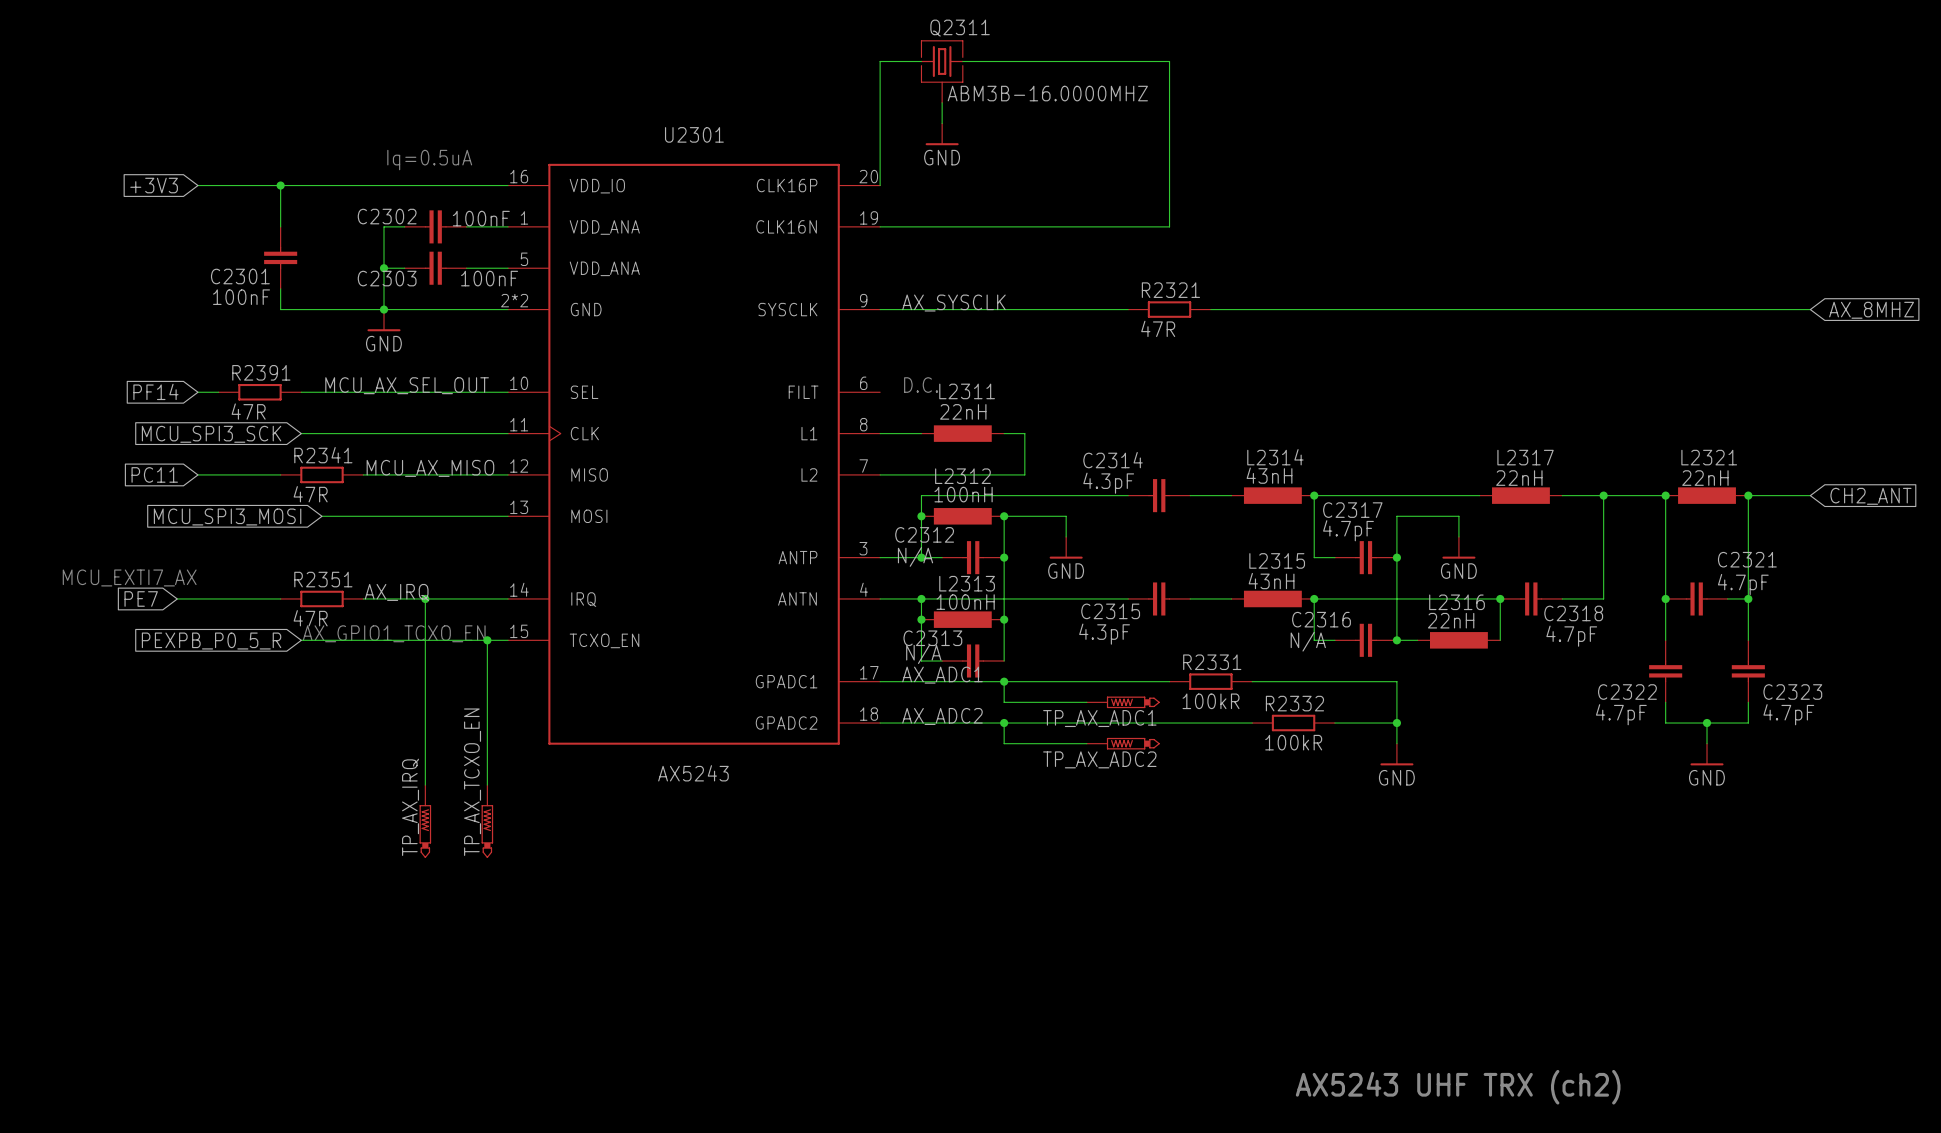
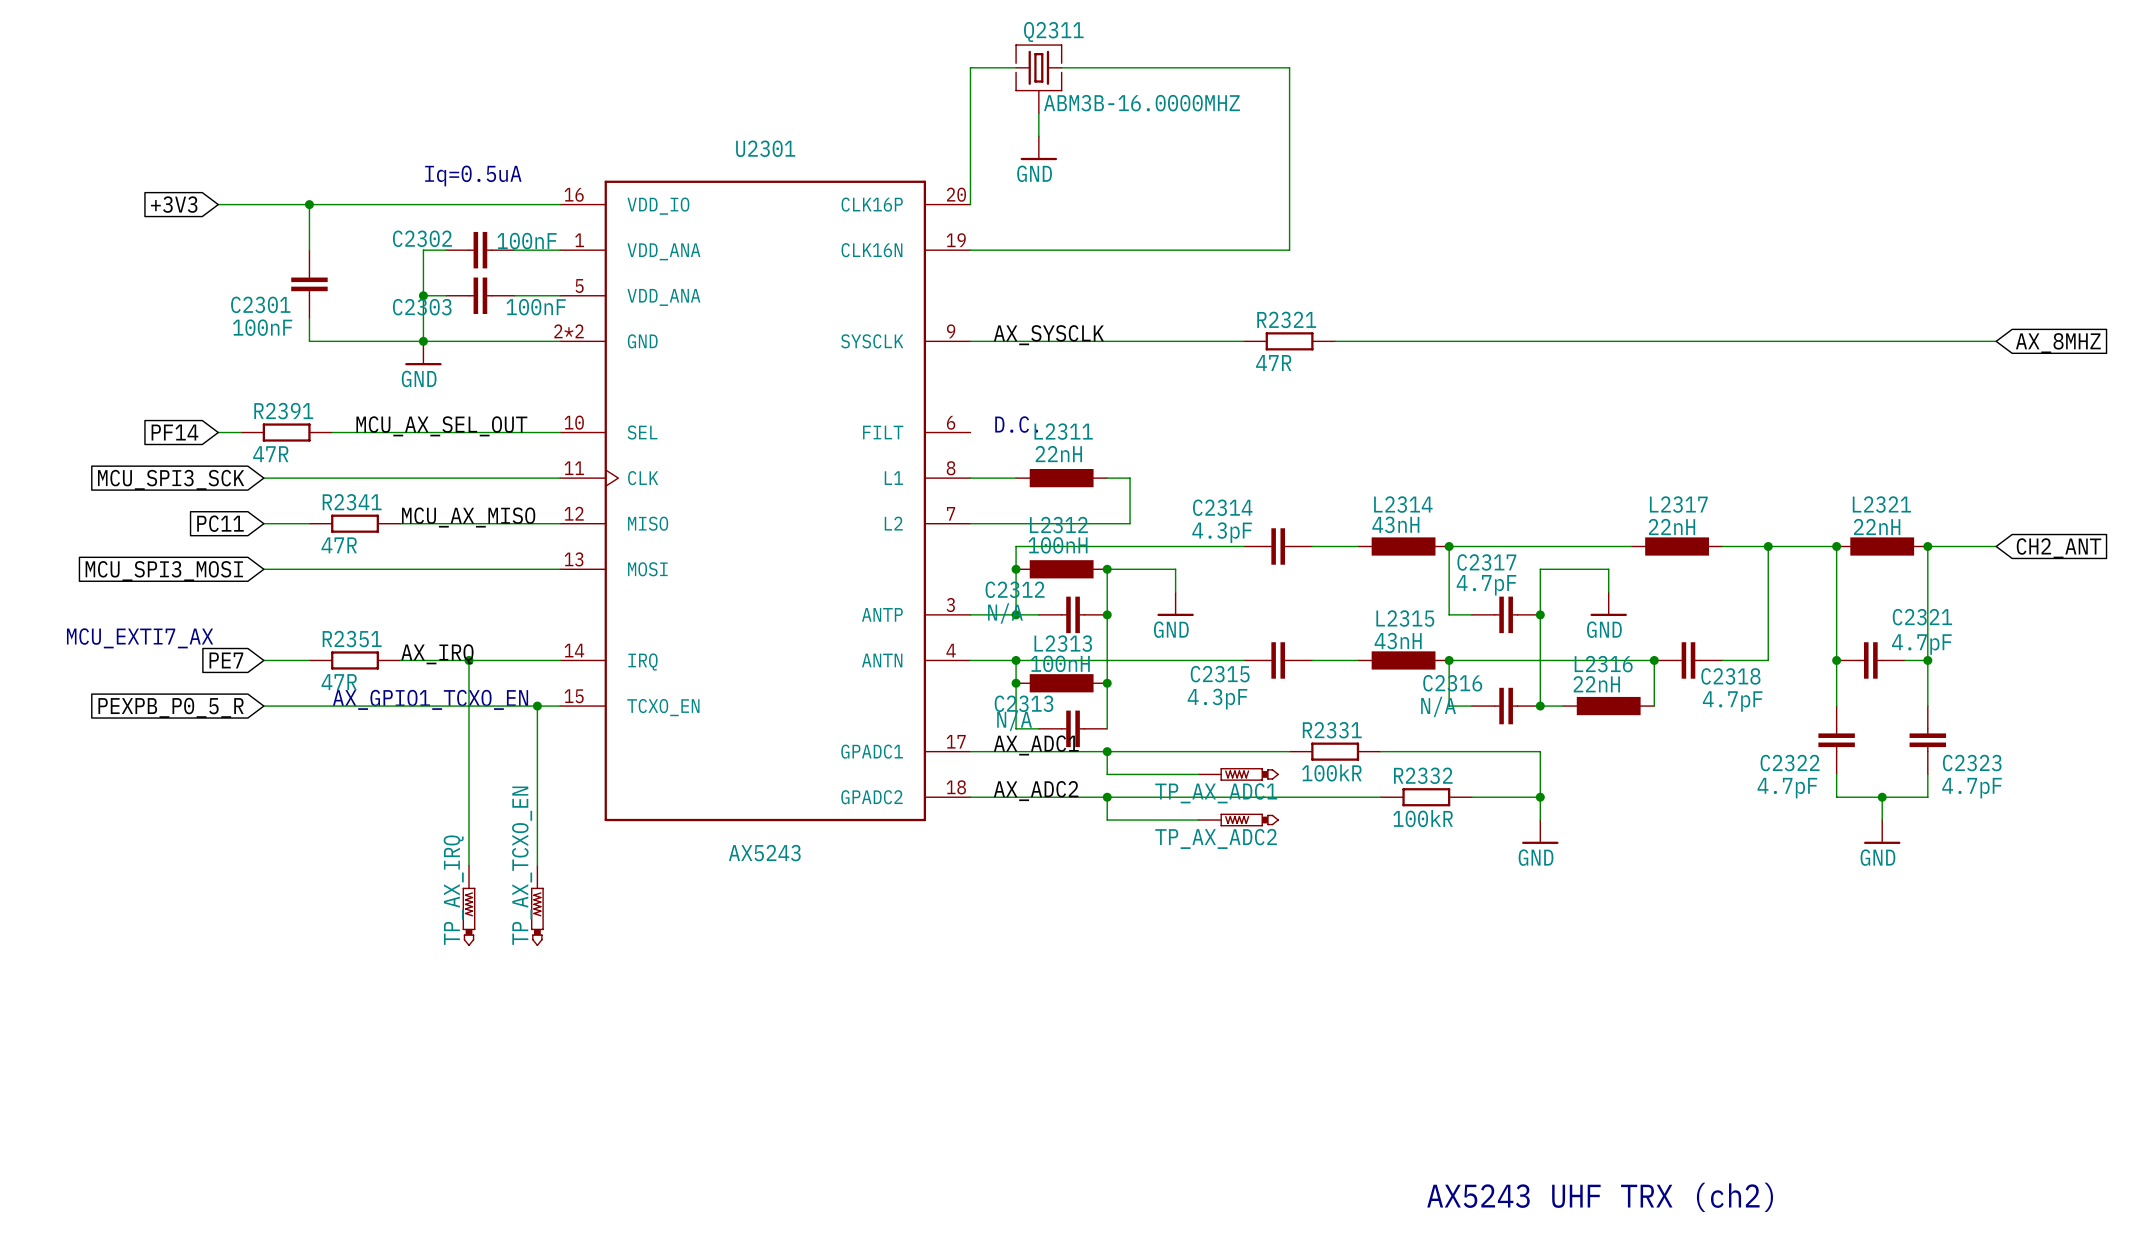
wire: none -> (263, 478) (332, 478)
global label position: MCU_SPI3_SCK (211, 434) -> MCU_SPI3_SCK (171, 479)
global label position: PC11 (154, 474) -> PC11 (220, 523)
wire: (197, 474) (239, 474) -> none
global label position: MCU_SPI3_MOSI (227, 516) -> MCU_SPI3_MOSI (164, 571)
wire: none -> (263, 569) (355, 569)
global label position: PE7 (141, 598) -> PE7 (226, 660)
wire: (177, 598) (239, 598) -> (263, 706) (332, 706)
global label position: PEXPB_P0_5_R (211, 641) -> PEXPB_P0_5_R (171, 707)

